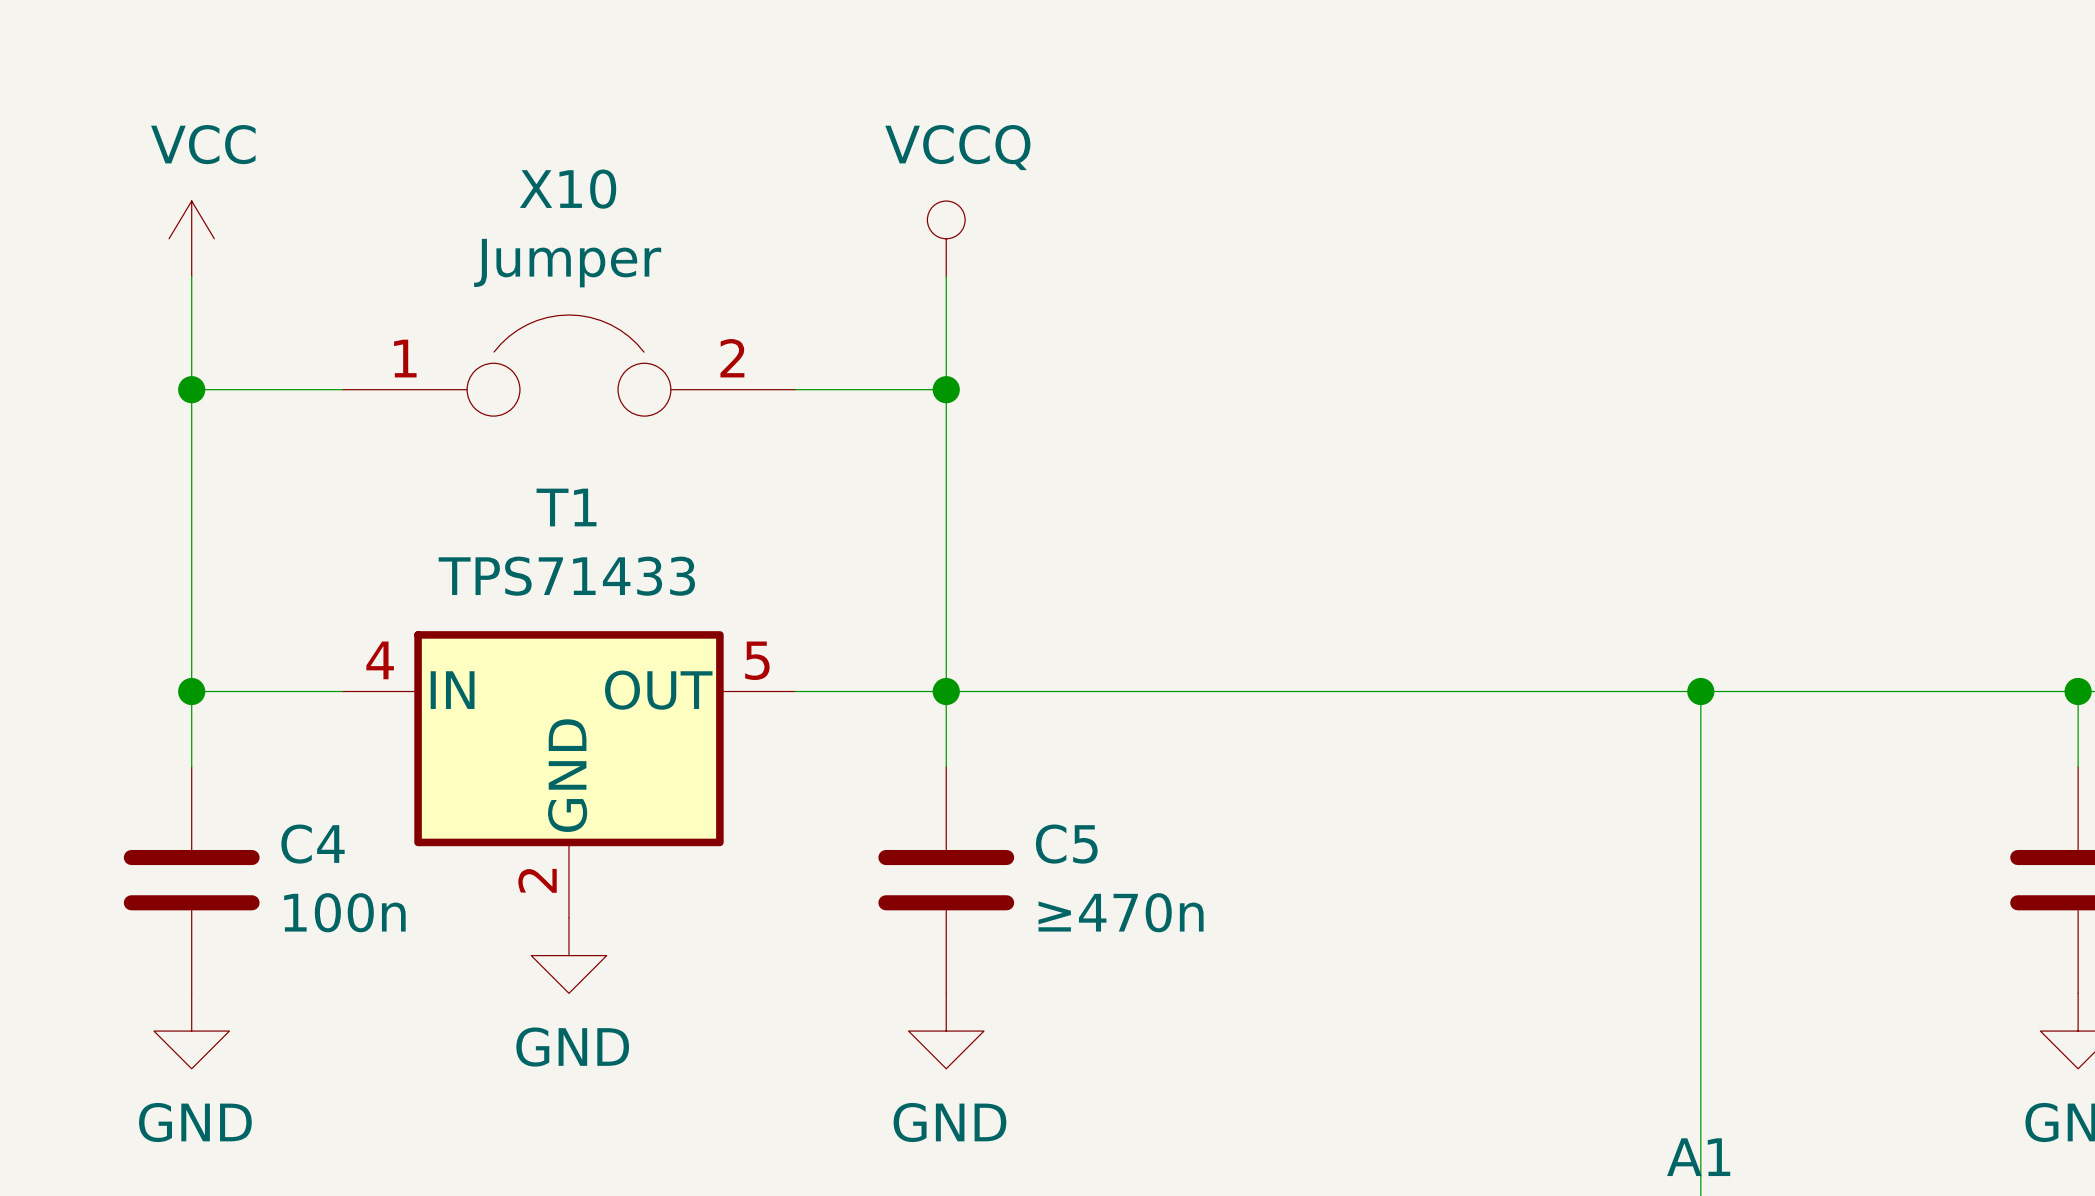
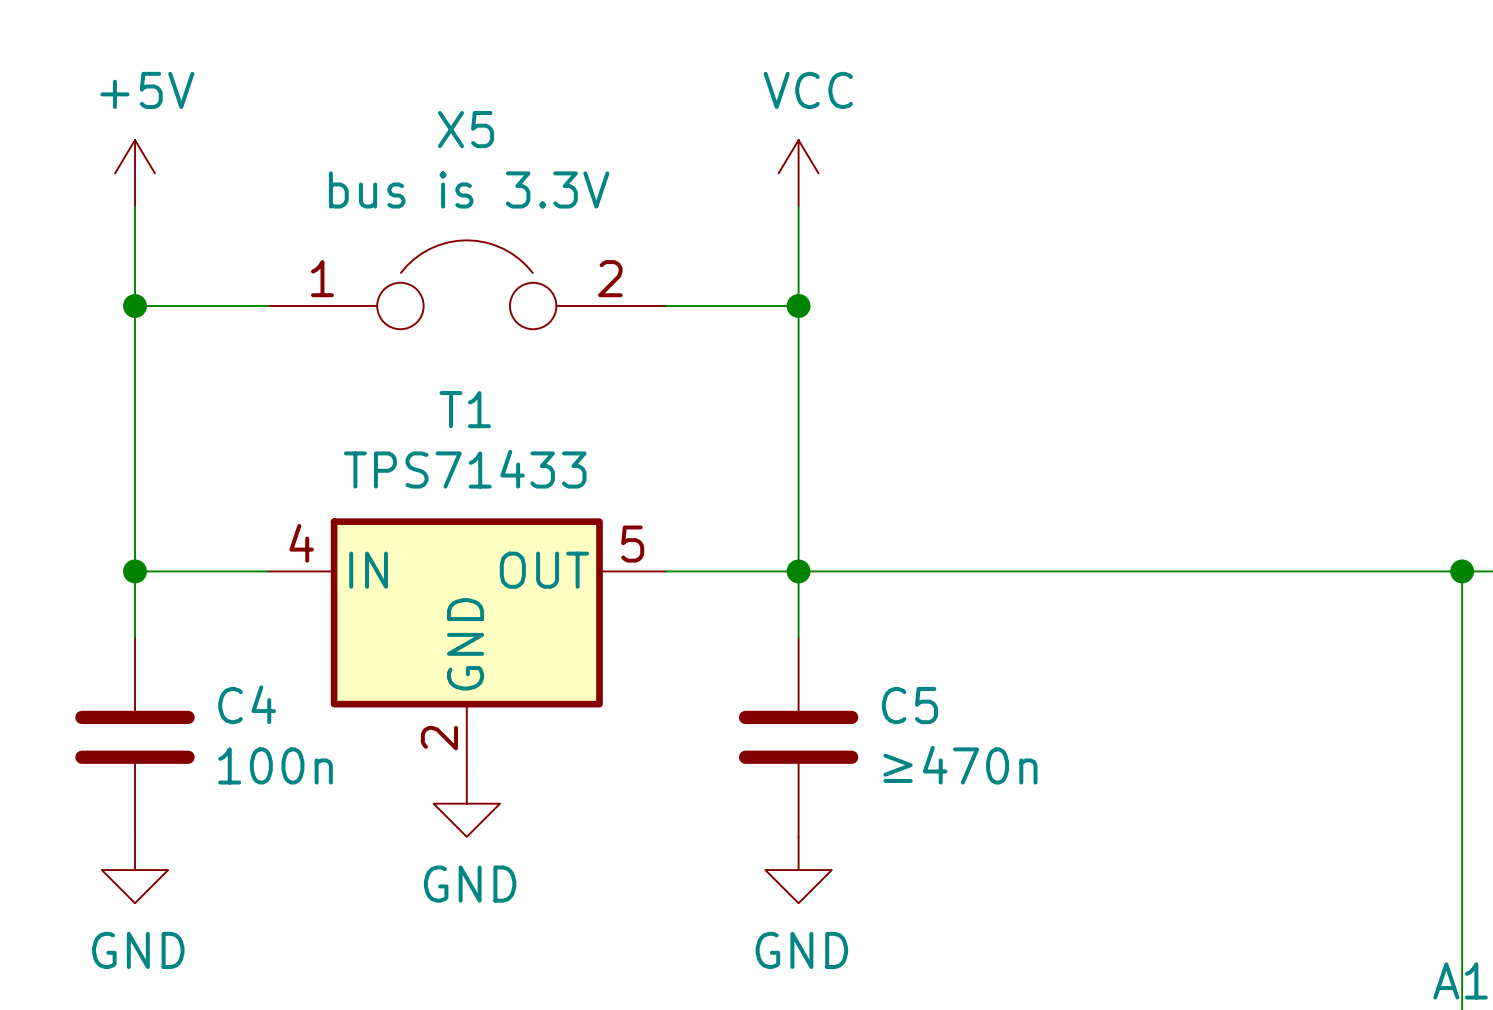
X10 name: X10 (568, 189) -> X5 (466, 129)
power symbol: VCC (191, 238) -> +5V (135, 173)
power symbol: VCCQ (946, 238) -> VCC (798, 173)
X10 value: Jumper (567, 263) -> bus is 3.3V (469, 189)

